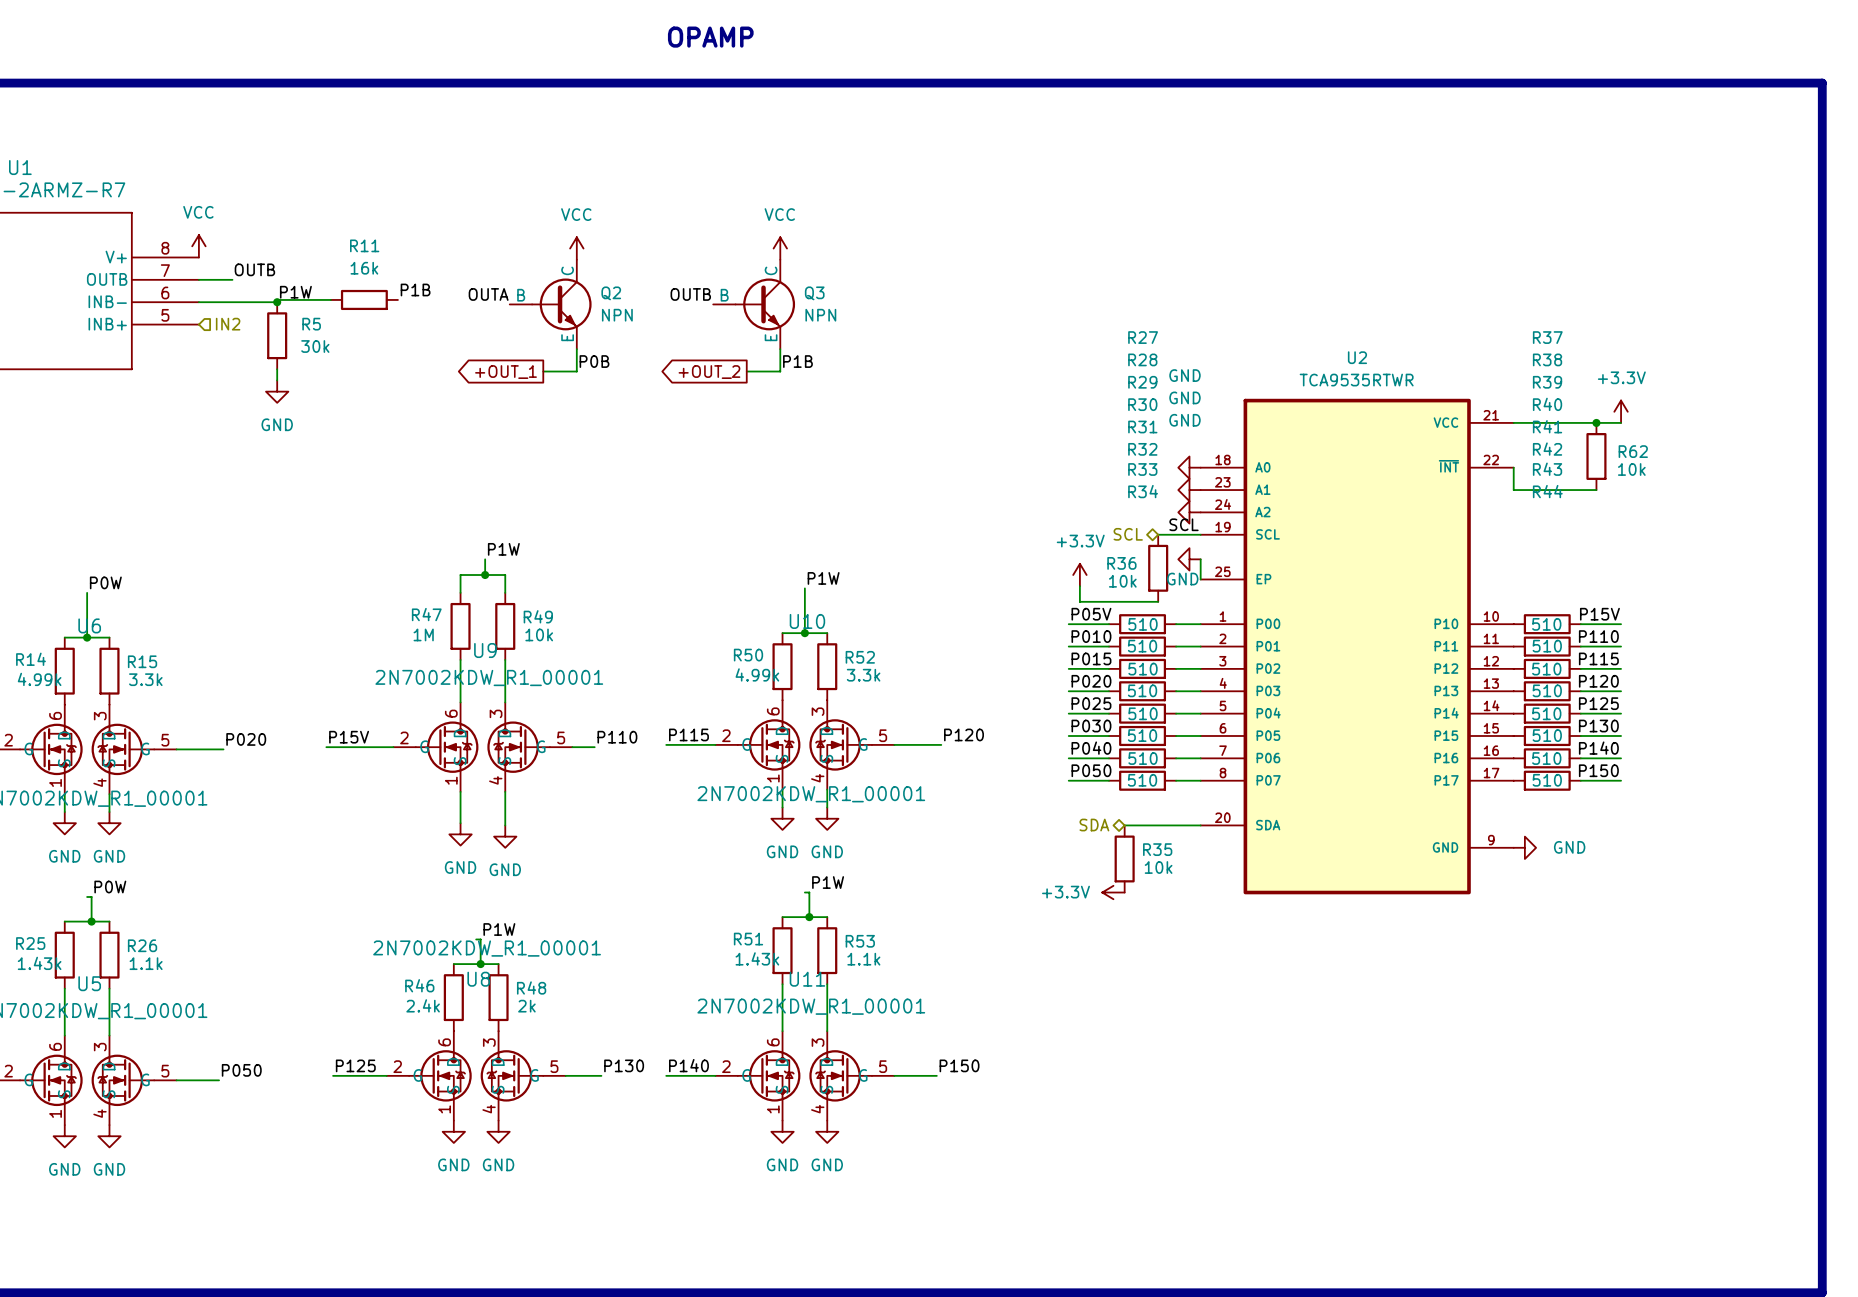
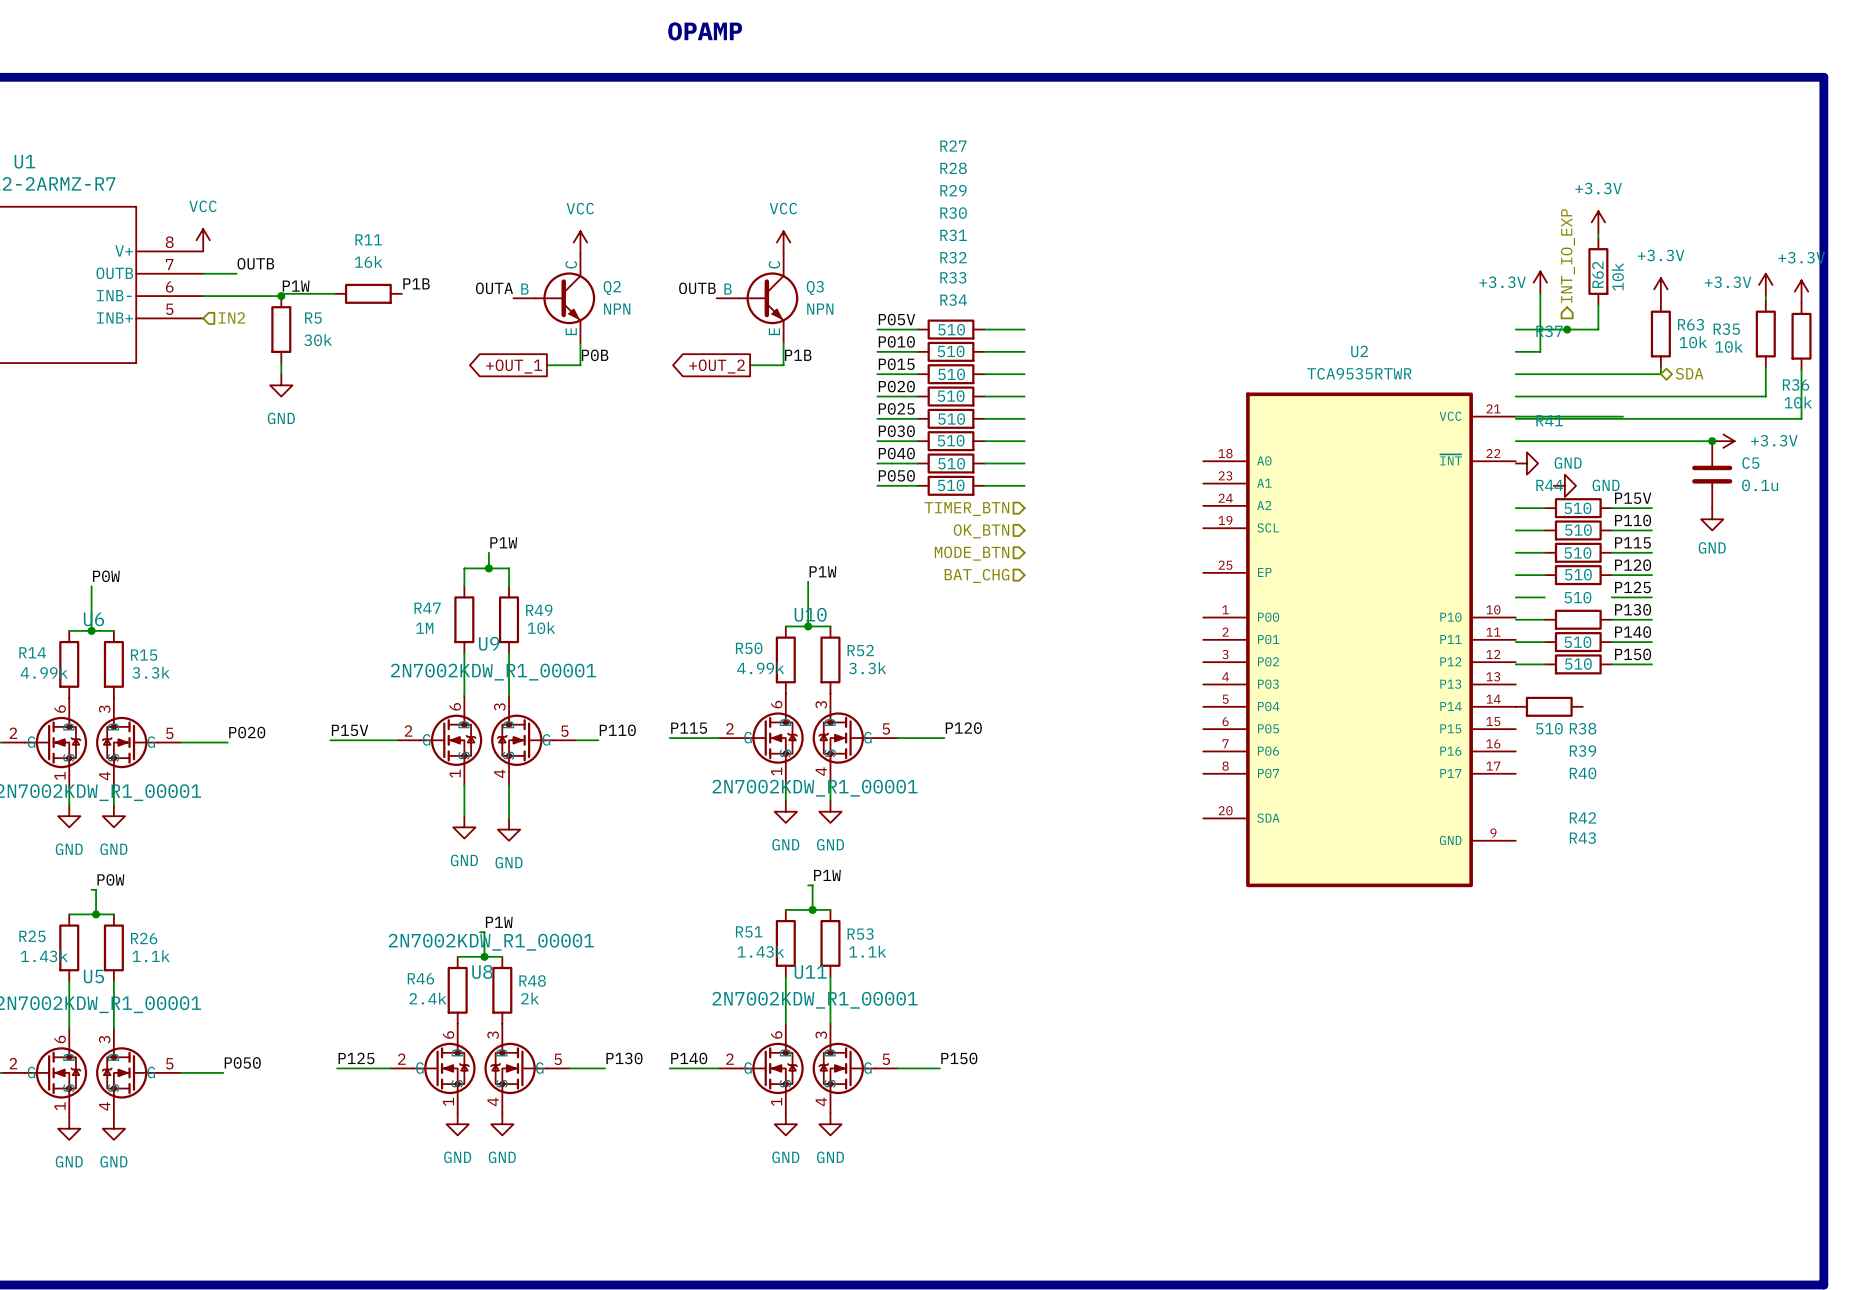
power symbol: none -> +3.3V (1598, 222)
wire: none -> (1598, 233) (1598, 238)
hierarchical label: none -> INT_IO_EXP (1567, 256)
power symbol: none -> +3.3V (1540, 282)
power symbol: none -> +3.3V (1765, 284)
power symbol: none -> +3.3V (1660, 289)
power symbol: none -> +3.3V (1801, 291)
wire: none -> (1540, 293) (1540, 351) (1515, 351)
wire: none -> (1765, 296) (1765, 300)
wire: none -> (1598, 305) (1598, 329) (1515, 329)
label: none -> P05V (896, 319)
wire: none -> (877, 329) (917, 329)
wire: none -> (984, 329) (1024, 329)
junction: none -> (1567, 329)
R27 name position: R27 (1143, 337) -> R27 (953, 145)
R63: none -> 10k (1660, 334)
label: none -> P010 (896, 341)
wire: none -> (877, 351) (917, 351)
wire: none -> (984, 351) (1024, 351)
R28 name position: R28 (1142, 359) -> R28 (953, 168)
R38 name position: R38 (1547, 359) -> R38 (1583, 728)
label: none -> P015 (896, 364)
wire: none -> (1660, 367) (1660, 374) (1515, 374)
wire: none -> (1765, 367) (1765, 396) (1515, 396)
wire: none -> (1801, 369) (1801, 418) (1515, 418)
wire: none -> (877, 374) (917, 374)
wire: none -> (984, 374) (1024, 374)
hierarchical label: none -> SDA (1689, 373)
R29 name position: R29 (1142, 382) -> R29 (953, 190)
R39 name position: R39 (1547, 382) -> R39 (1582, 751)
label: none -> P020 (896, 386)
wire: none -> (877, 396) (917, 396)
wire: none -> (984, 396) (1024, 396)
R30 name position: R30 (1142, 404) -> R30 (953, 213)
R40 name position: R40 (1547, 404) -> R40 (1583, 773)
power symbol: +3.3V (1621, 411) -> none
label: none -> P025 (896, 408)
junction: (1596, 422) -> none
wire: none -> (877, 418) (917, 418)
R31 name position: R31 (1142, 427) -> R31 (953, 235)
label: none -> P030 (896, 431)
wire: none -> (877, 441) (917, 441)
wire: none -> (1515, 441) (1712, 441)
junction: none -> (1712, 441)
power symbol: none -> +3.3V (1723, 441)
R32 name position: R32 (1142, 449) -> R32 (953, 257)
R42 name position: R42 (1547, 449) -> R42 (1582, 817)
R62 name rotation: 0° (1633, 451) -> 90° counterclockwise (1597, 274)
R62 position: (1596, 456) -> (1598, 271)
label: none -> P040 (896, 453)
power symbol: GND (1189, 467) -> none
wire: (1513, 467) (1513, 490) (1596, 490) -> none
wire: none -> (877, 463) (917, 463)
R33 name position: R33 (1142, 469) -> R33 (953, 277)
power symbol: none -> GND (1526, 463)
R43 name position: R43 (1547, 469) -> R43 (1582, 838)
R62 value rotation: 0° (1631, 469) -> 90° counterclockwise (1617, 277)
C5: none -> 0.1u (1712, 474)
label: none -> P050 (896, 475)
power symbol: GND (1189, 490) -> none
R34 name position: R34 (1143, 491) -> R34 (953, 300)
wire: none -> (877, 485) (917, 485)
power symbol: none -> GND (1564, 485)
power symbol: GND (1189, 512) -> none
hierarchical label: none -> TIMER_BTN (966, 509)
wire: none -> (1515, 508) (1544, 508)
label: SCL (1183, 524) -> none
power symbol: none -> GND (1712, 519)
hierarchical label: SCL (1128, 534) -> none
wire: (1158, 534) (1200, 534) -> none
wire: none -> (1515, 530) (1544, 530)
hierarchical label: none -> OK_BTN (981, 531)
hierarchical label: none -> MODE_BTN (972, 553)
power symbol: GND (1189, 559) -> none
wire: (1200, 559) (1200, 579) -> none
wire: none -> (1515, 552) (1544, 552)
R36 name position: R36 (1121, 563) -> R36 (1796, 384)
R36 position: (1158, 568) -> (1801, 336)
power symbol: +3.3V (1079, 575) -> none
hierarchical label: none -> BAT_CHG (977, 575)
R36 value position: 10k (1122, 581) -> 10k (1798, 402)
wire: none -> (1515, 575) (1544, 575)
wire: (1079, 586) (1079, 601) (1158, 601) -> none
wire: none -> (1515, 597) (1544, 597)
label: P05V (1091, 614) -> none
label position: P15V (1599, 614) -> P15V (1633, 498)
wire: (1068, 624) (1108, 624) -> (984, 418) (1024, 418)
R27 position: (1142, 624) -> (951, 329)
wire: (1176, 624) (1200, 624) -> none
R37 position: (1547, 624) -> (1578, 508)
wire: (1580, 624) (1621, 624) -> (1611, 508) (1651, 508)
wire: none -> (1515, 619) (1544, 619)
label: P010 (1091, 636) -> none
label position: P110 (1598, 636) -> P110 (1633, 520)
wire: (1068, 646) (1108, 646) -> (984, 441) (1024, 441)
R28 position: (1142, 646) -> (951, 351)
wire: (1176, 646) (1200, 646) -> none
R38 position: (1547, 646) -> (1578, 530)
wire: (1580, 646) (1621, 646) -> (1611, 530) (1651, 530)
wire: none -> (1515, 642) (1544, 642)
label: P015 (1091, 658) -> none
label position: P115 (1598, 658) -> P115 (1632, 542)
wire: (1068, 668) (1108, 668) -> (984, 463) (1024, 463)
R29 position: (1142, 668) -> (951, 374)
wire: (1176, 668) (1200, 668) -> none
R39 position: (1547, 668) -> (1578, 552)
wire: (1580, 668) (1621, 668) -> (1611, 552) (1651, 552)
wire: none -> (1515, 664) (1544, 664)
label: P020 (1091, 681) -> none
label position: P120 (1598, 681) -> P120 (1633, 565)
wire: (1068, 691) (1108, 691) -> (984, 485) (1024, 485)
R30 position: (1142, 691) -> (951, 396)
wire: (1176, 691) (1200, 691) -> none
R40 position: (1547, 691) -> (1578, 575)
wire: (1580, 691) (1621, 691) -> (1611, 575) (1651, 575)
label: P025 (1091, 703) -> none
label position: P125 (1598, 703) -> P125 (1632, 587)
wire: (1068, 713) (1108, 713) -> none
R31 position: (1142, 713) -> (951, 418)
wire: (1176, 713) (1200, 713) -> none
wire: (1580, 713) (1621, 713) -> (1611, 597) (1651, 597)
label: P030 (1091, 726) -> none
label position: P130 (1598, 726) -> P130 (1633, 609)
wire: (1068, 735) (1108, 735) -> none
R32 position: (1142, 735) -> (951, 441)
wire: (1176, 735) (1200, 735) -> none
R42 position: (1547, 735) -> (1578, 619)
wire: (1580, 735) (1621, 735) -> (1611, 619) (1651, 619)
label: P040 (1091, 748) -> none
label position: P140 (1598, 748) -> P140 (1633, 632)
wire: (1068, 758) (1108, 758) -> none
R33 position: (1142, 758) -> (951, 463)
wire: (1176, 758) (1200, 758) -> none
R43 position: (1547, 758) -> (1578, 642)
wire: (1580, 758) (1621, 758) -> (1611, 642) (1651, 642)
label: P050 (1091, 770) -> none
label position: P150 (1598, 770) -> P150 (1633, 654)
wire: (1068, 780) (1108, 780) -> none
R34 position: (1142, 780) -> (951, 485)
wire: (1176, 780) (1200, 780) -> none
R44 position: (1547, 780) -> (1578, 664)
wire: (1580, 780) (1621, 780) -> (1611, 664) (1651, 664)
hierarchical label: SDA (1094, 825) -> none
wire: (1124, 825) (1200, 825) -> none
power symbol: GND (1524, 847) -> none
R35 name position: R35 (1157, 849) -> R35 (1726, 329)
R35 position: (1124, 858) -> (1765, 334)
R35 value position: 10k (1158, 867) -> 10k (1729, 346)
power symbol: +3.3V (1113, 892) -> none

